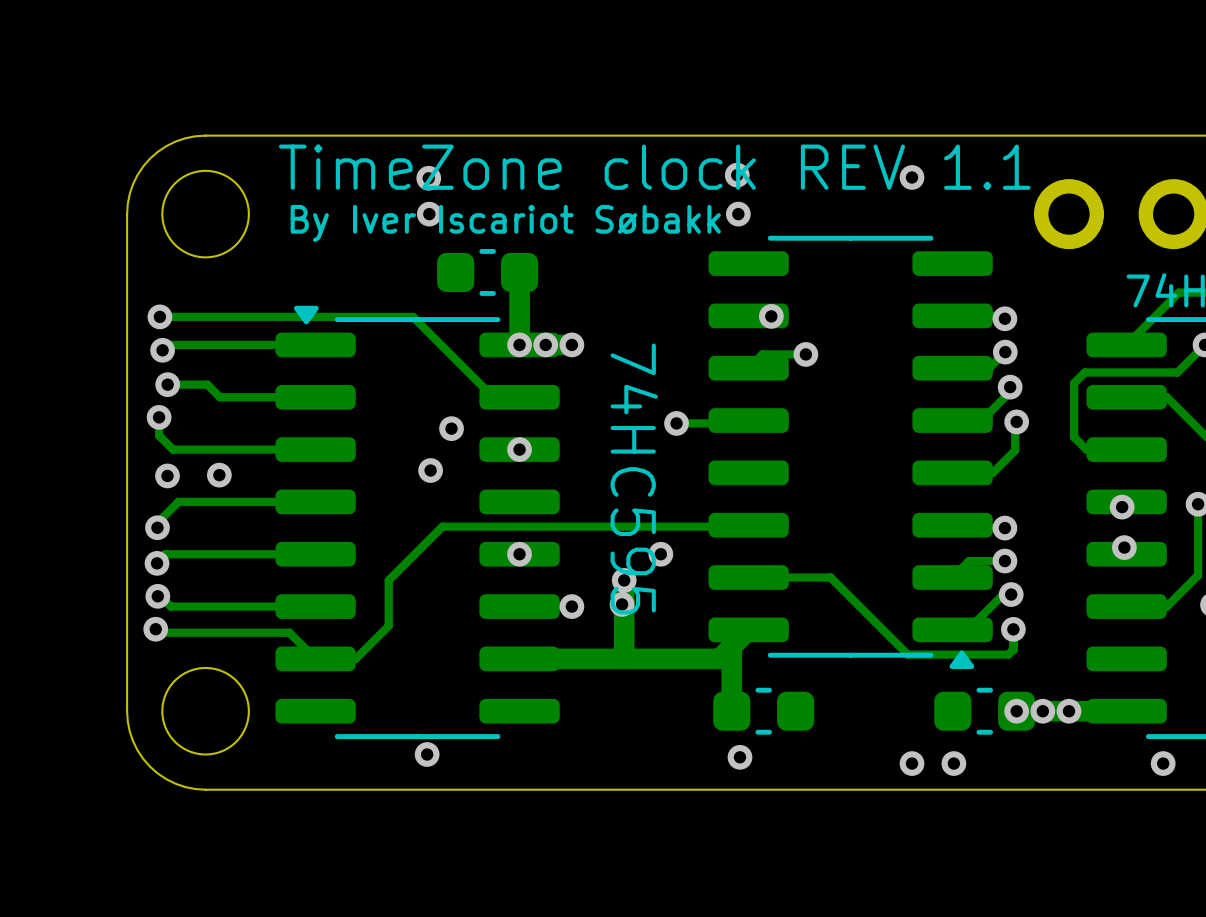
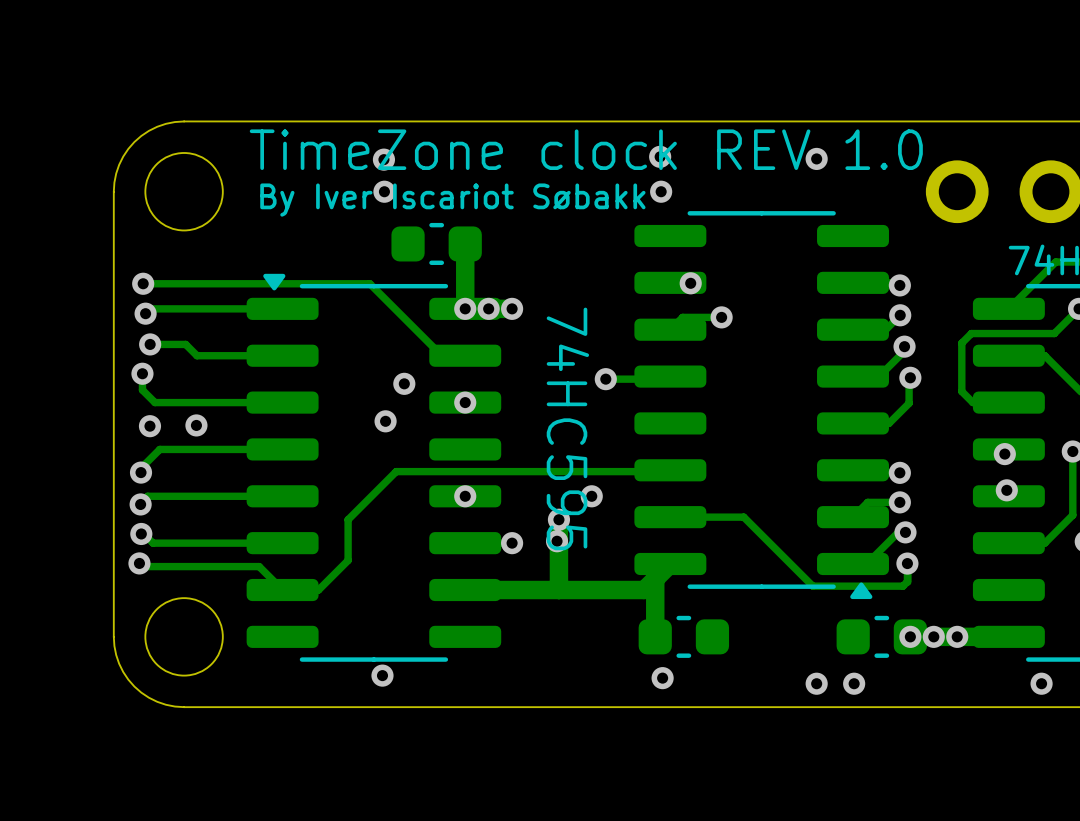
text: TimeZone clock REV 1.1 (654, 167) -> TimeZone clock REV 1.0 (586, 149)

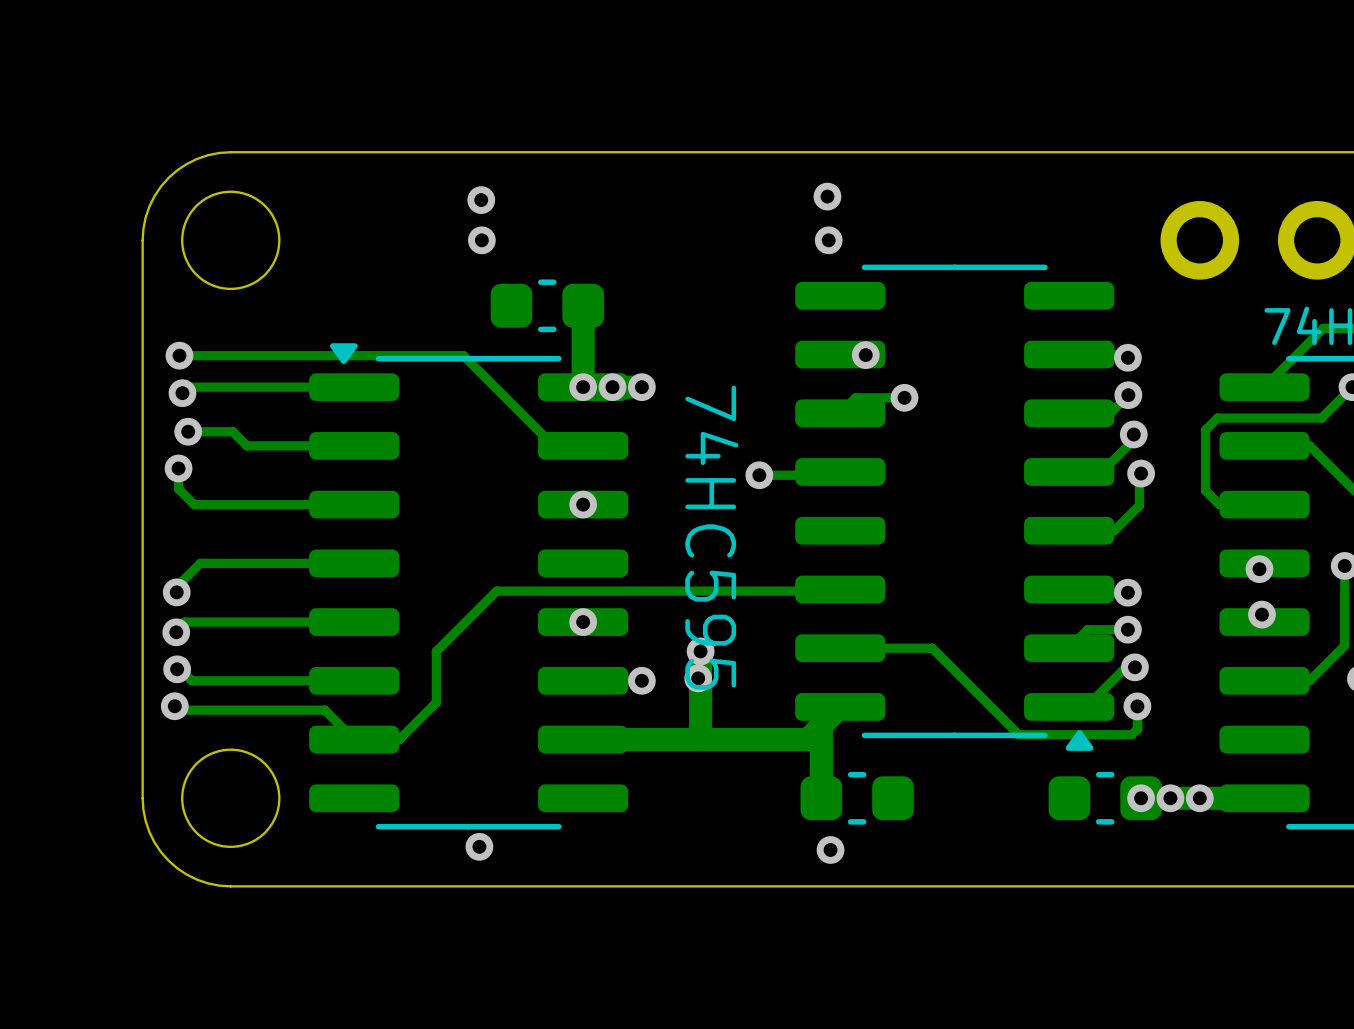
text: TimeZone clock REV 1.0 (586, 149) -> none
via: (816, 158) -> none
text: By Iver Iscariot Søbakk (452, 200) -> none
via: (404, 383) -> none
via: (385, 421) -> none
via: (196, 425) -> none
via: (149, 426) -> none
via: (591, 496) -> none
via: (816, 683) -> none
via: (854, 683) -> none
via: (1041, 683) -> none

